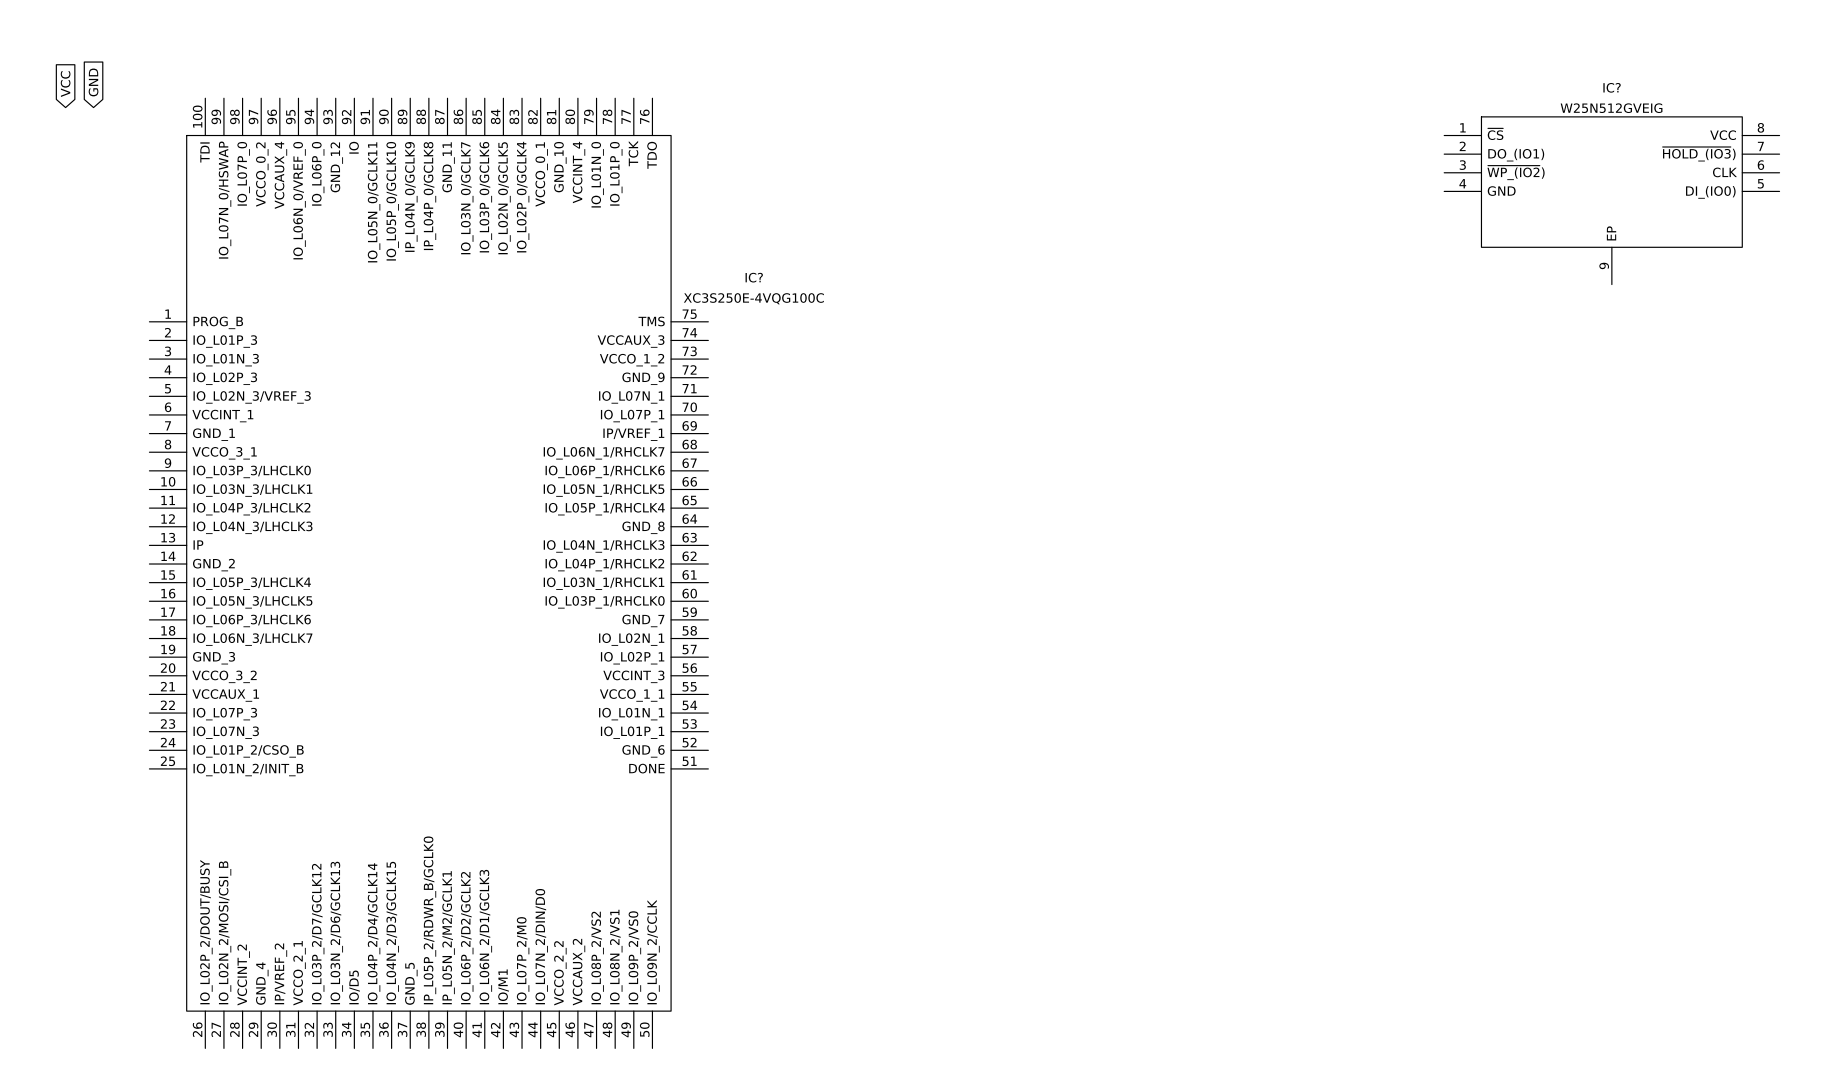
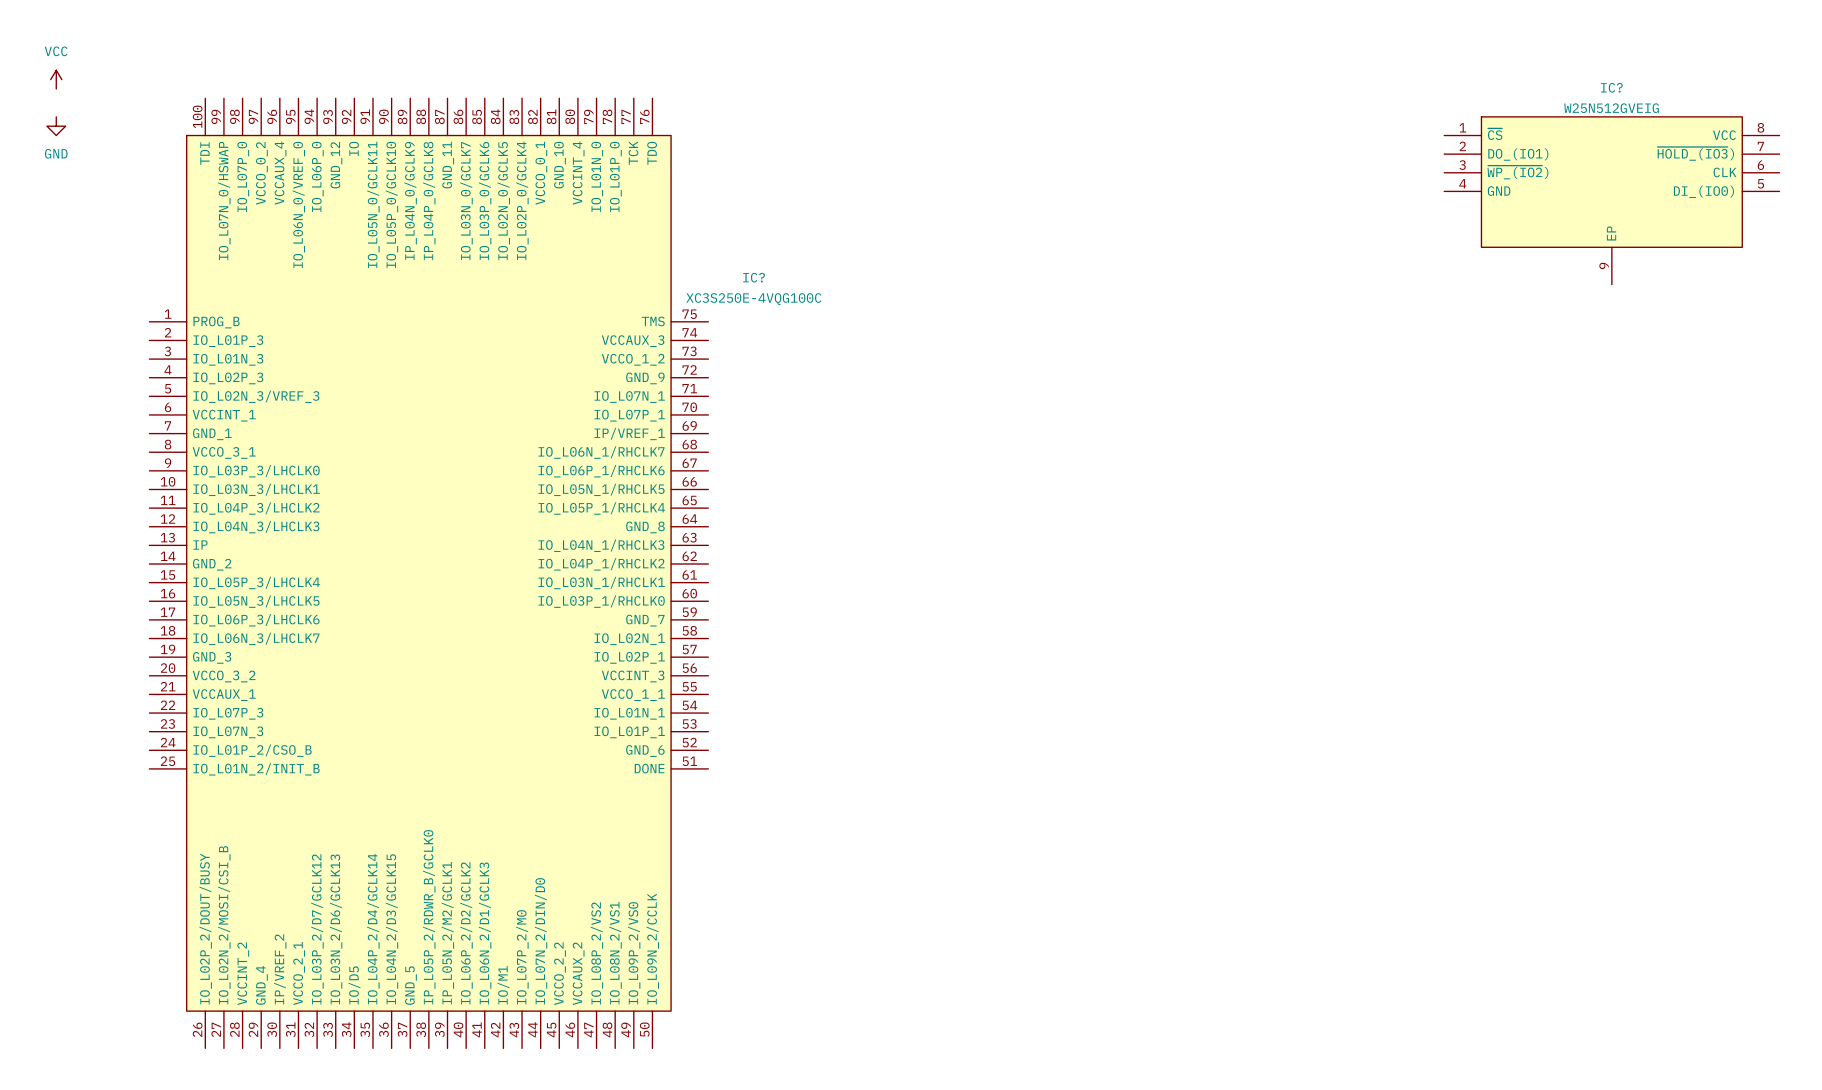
power symbol: none -> VCC (56, 79)
global label: GND (93, 82) -> none
global label: VCC (65, 84) -> none
power symbol: none -> GND (56, 126)

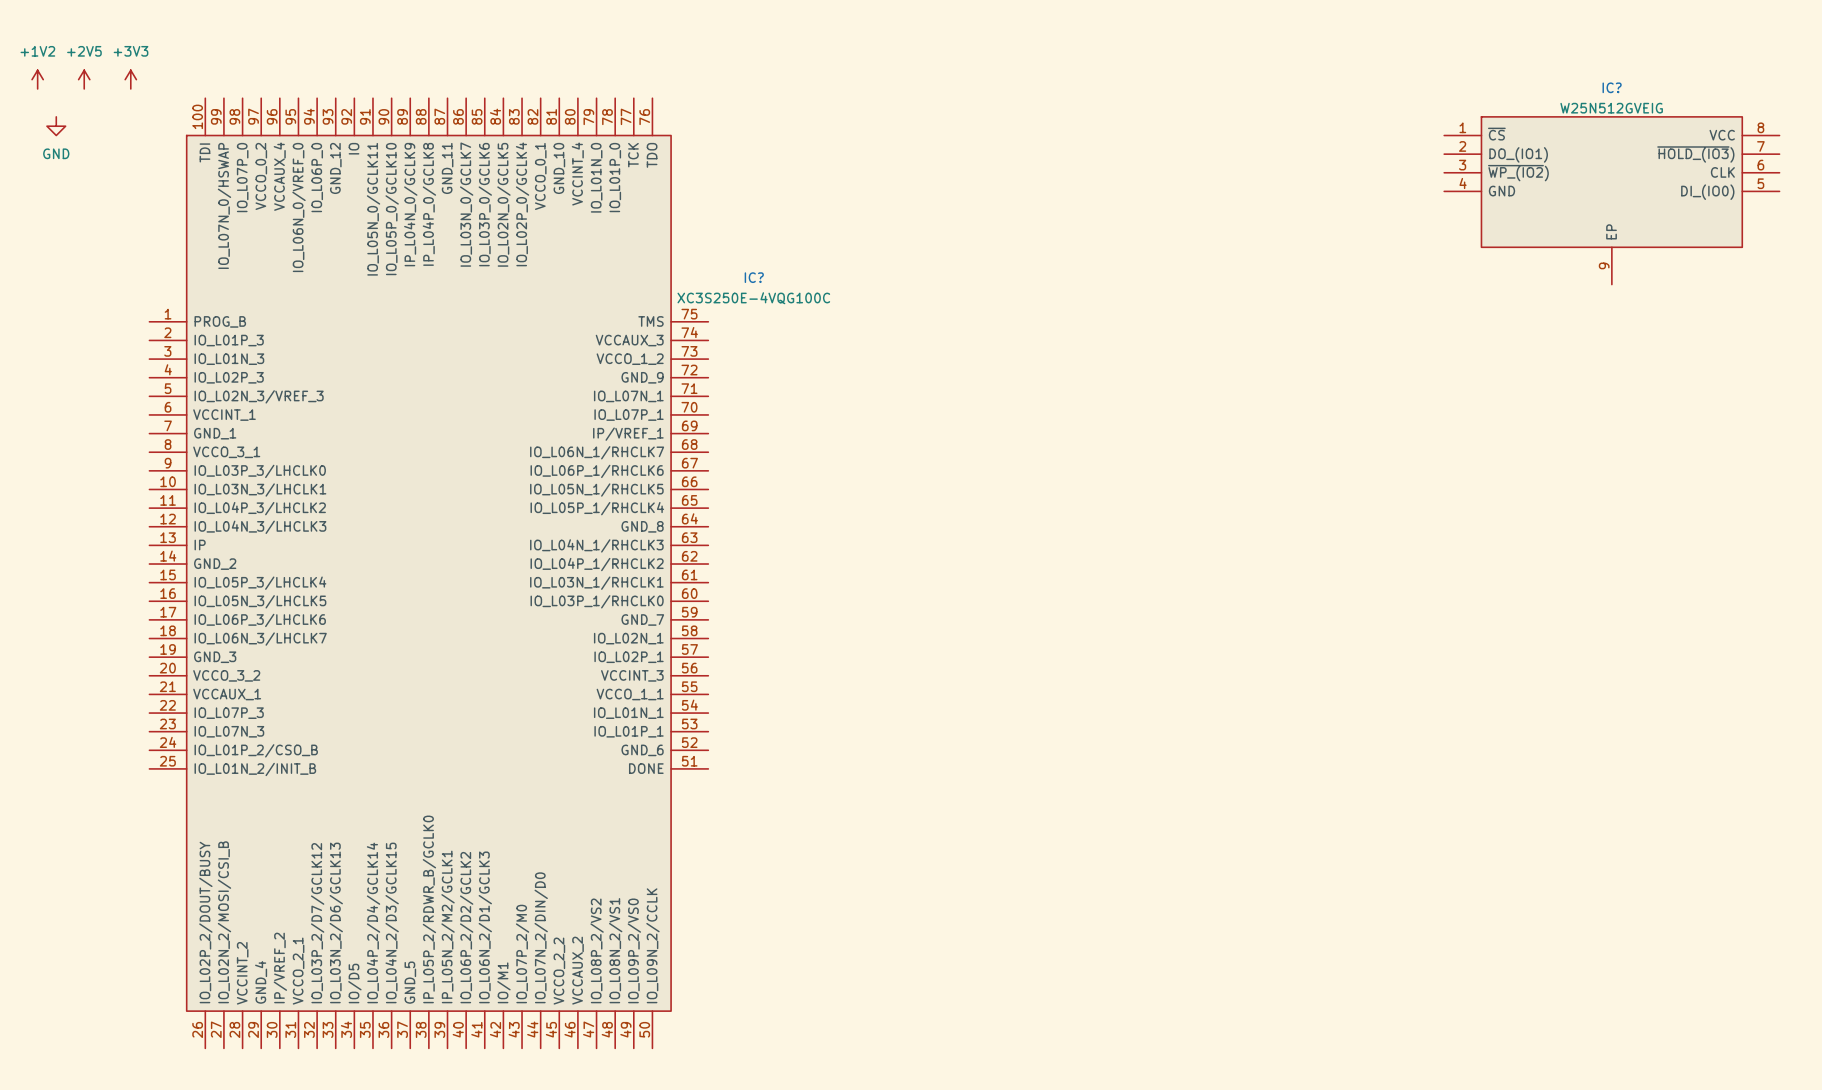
power symbol: none -> +1V2 (37, 79)
power symbol: VCC (56, 79) -> none
power symbol: none -> +2V5 (84, 79)
power symbol: none -> +3V3 (130, 79)

